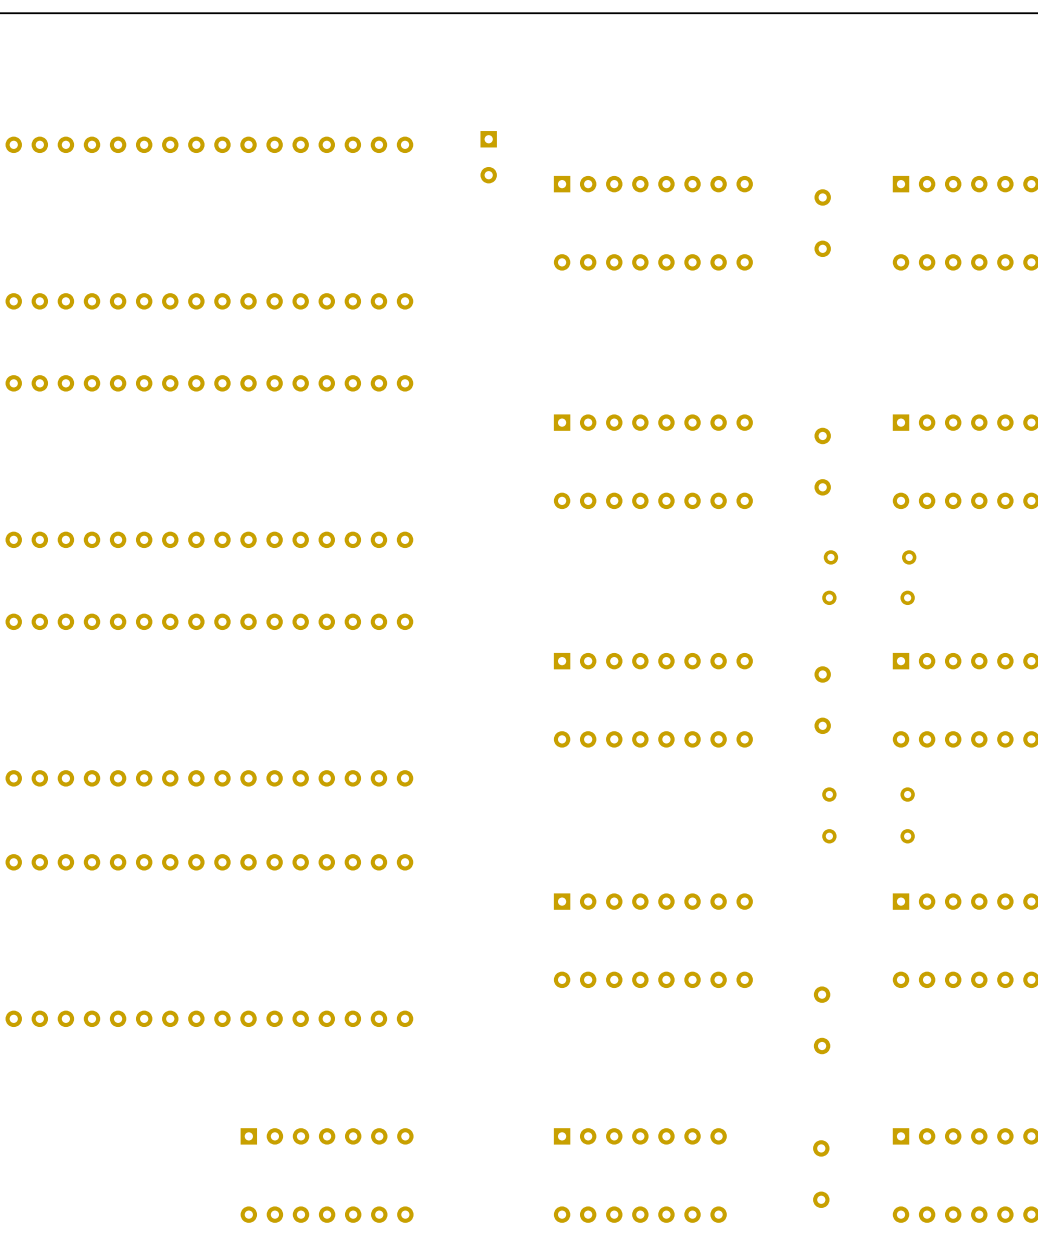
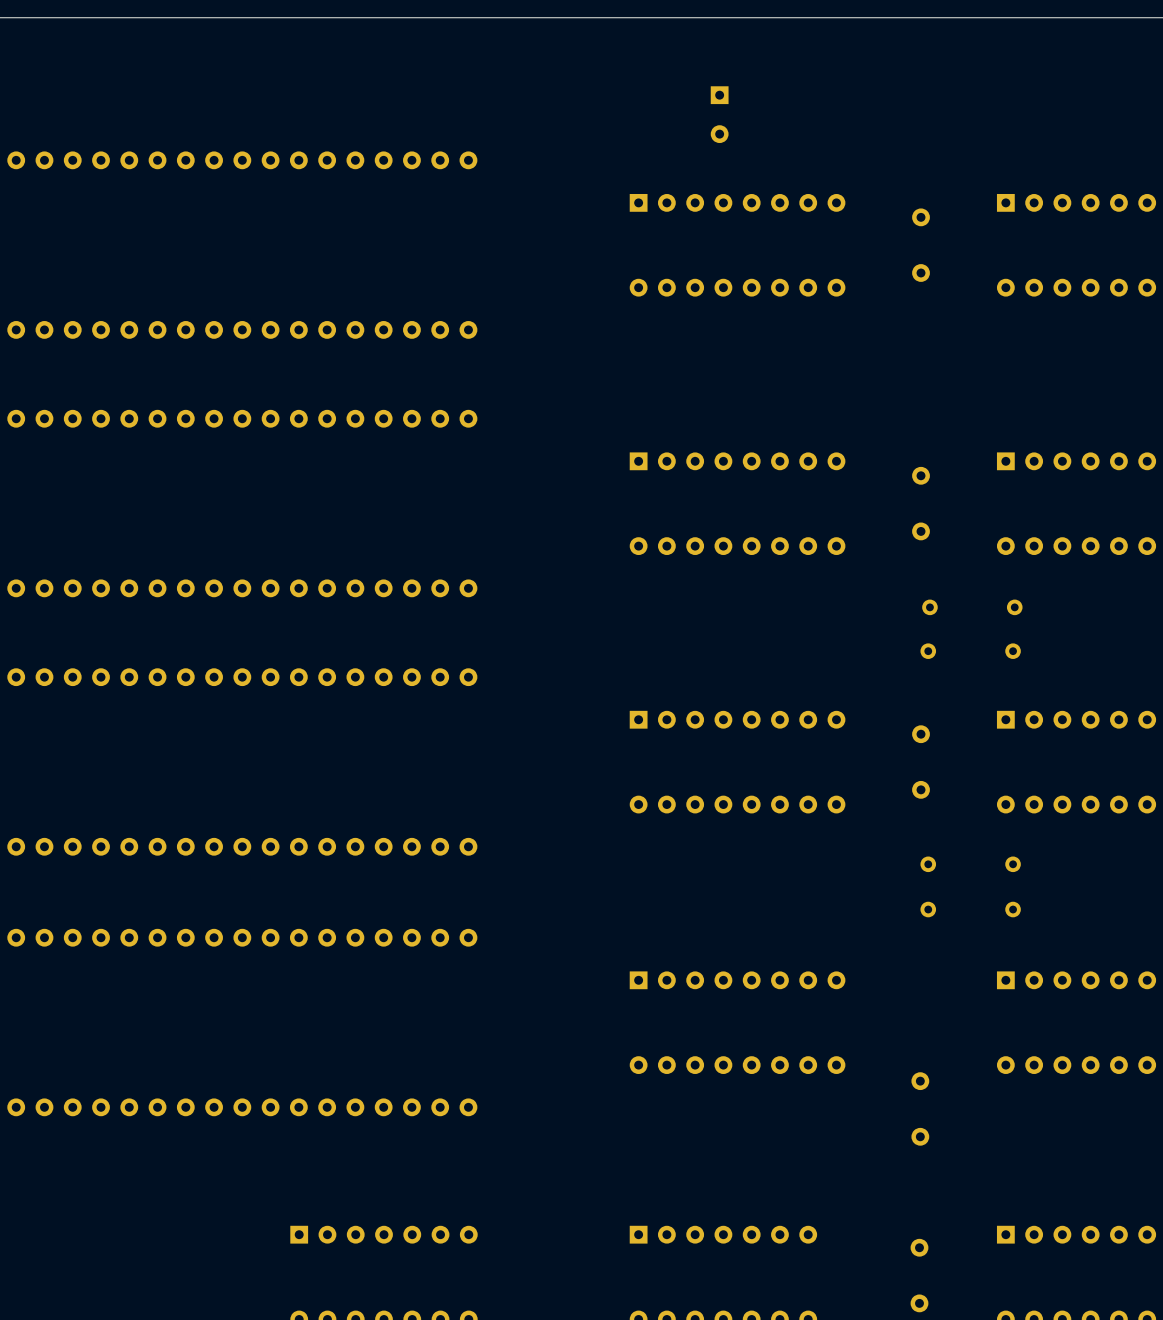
part position: (488, 157) -> (719, 114)

